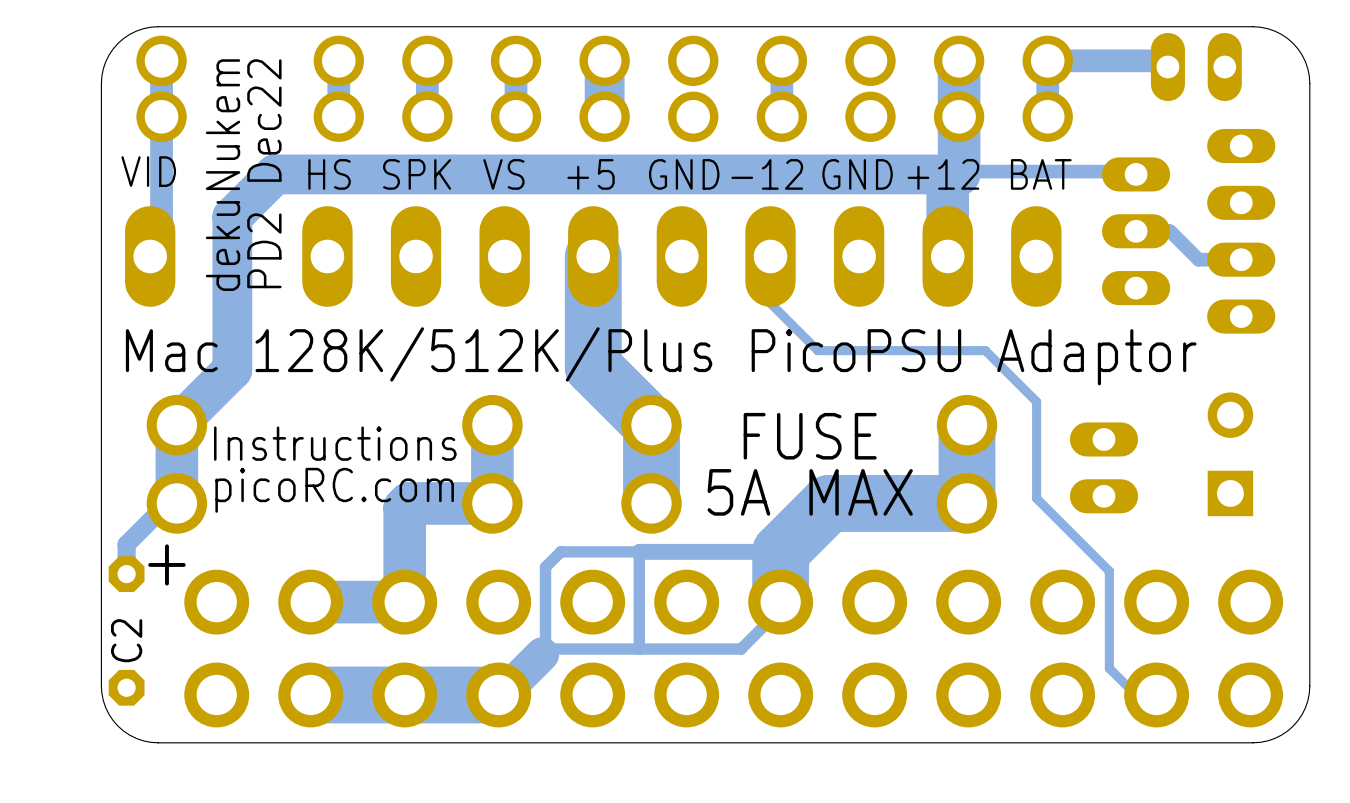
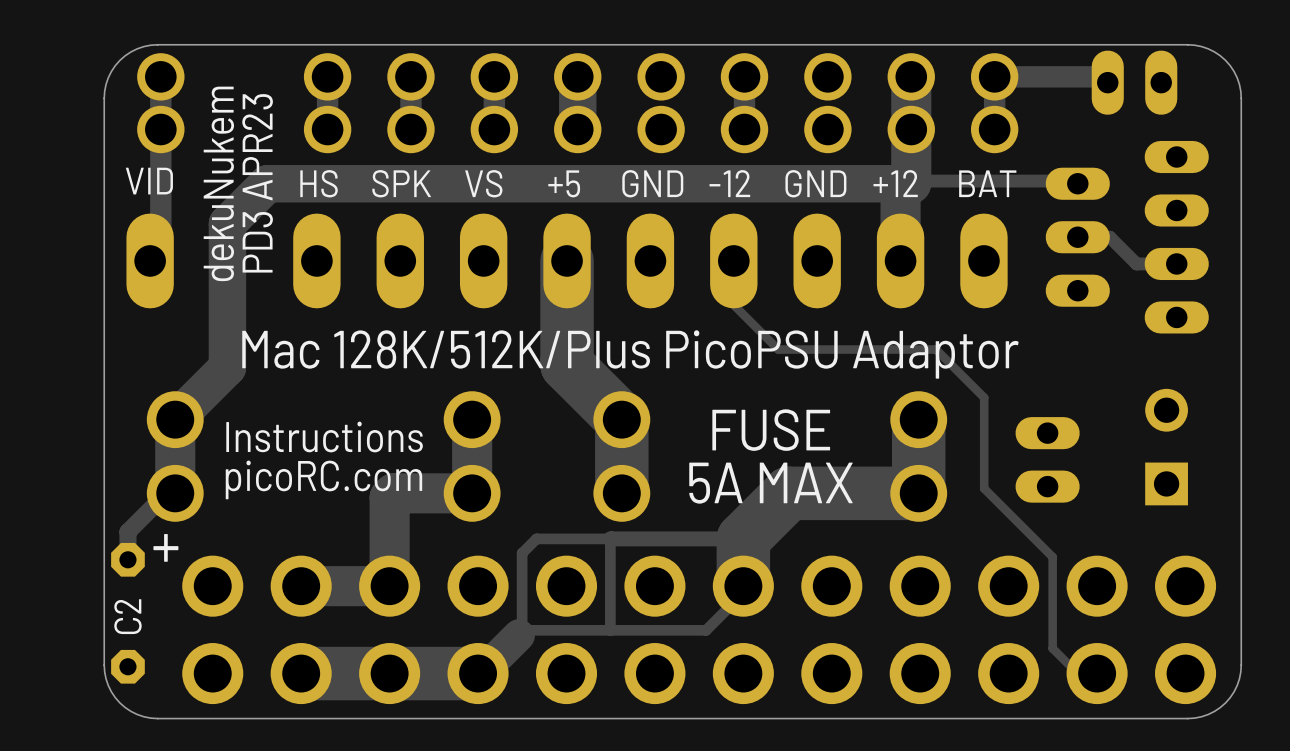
text: PD2 Dec22 (264, 173) -> PD3 APR23 (257, 183)

